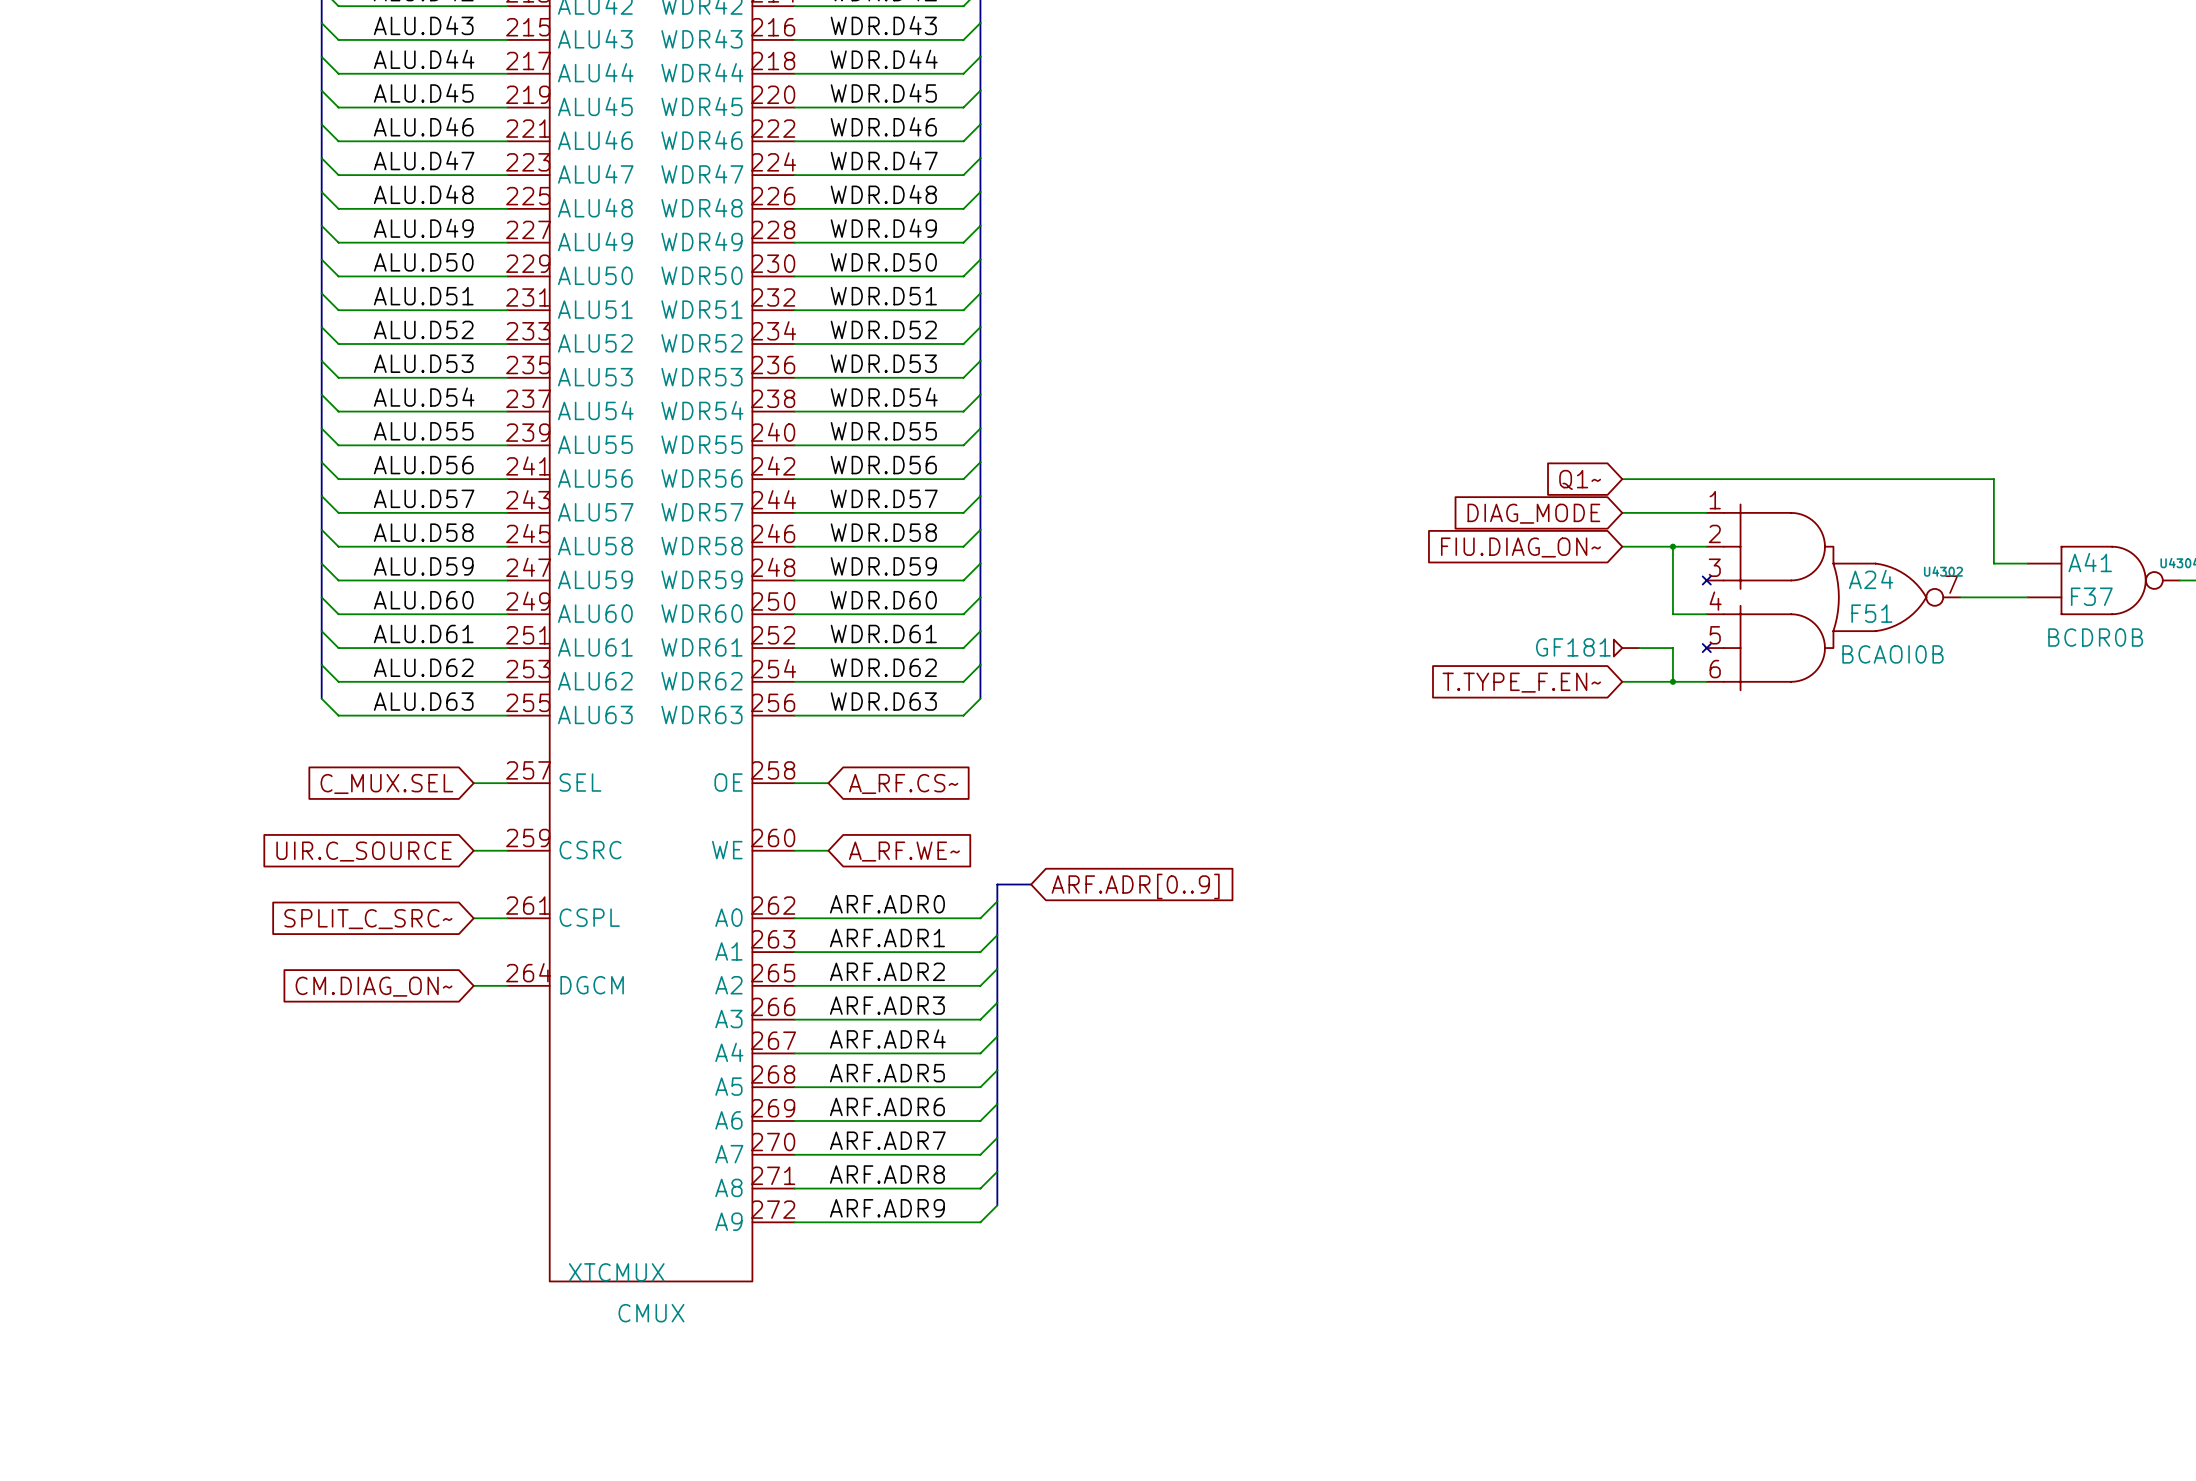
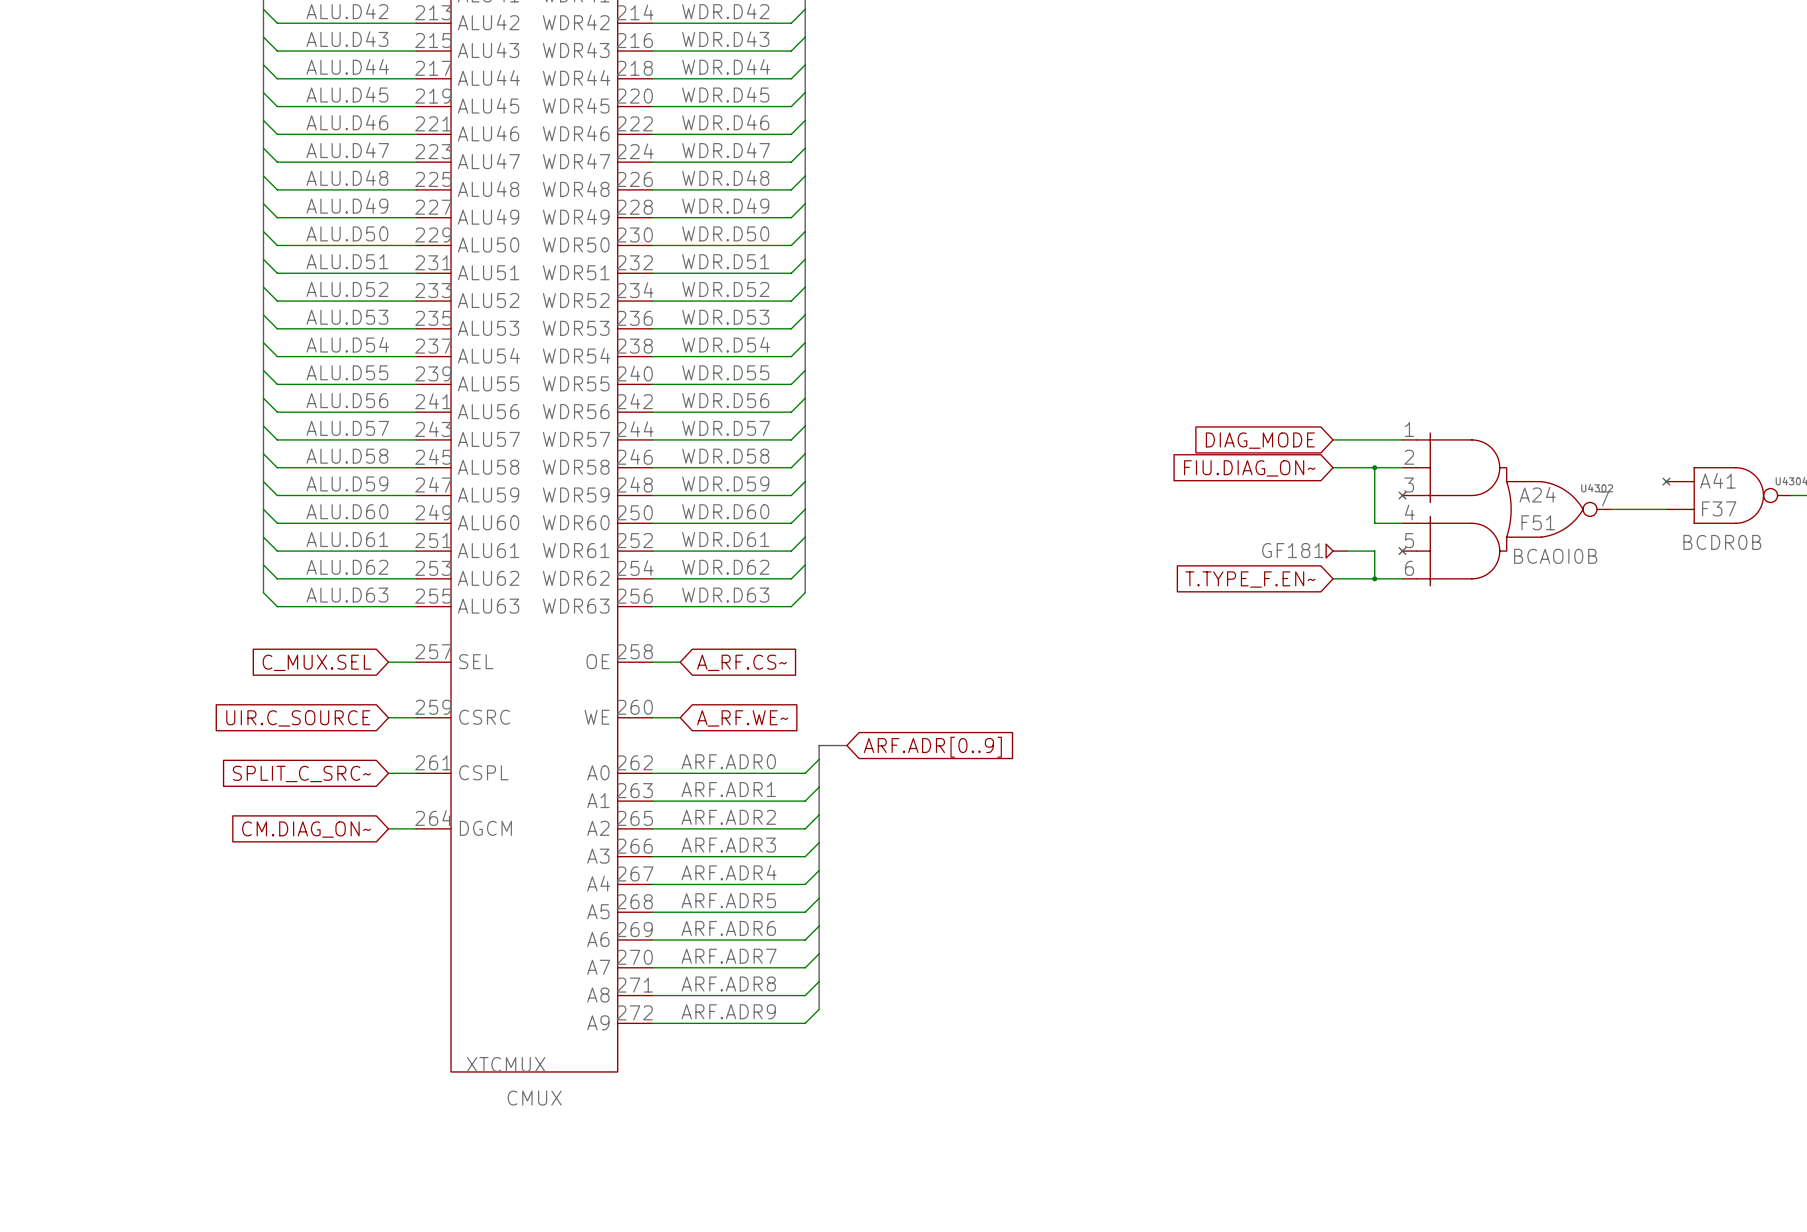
global label: Q1~ (1580, 479) -> none
wire: (1622, 479) (1993, 479) (1993, 563) (2027, 563) -> none
no-connect mark: none -> (1666, 481)

